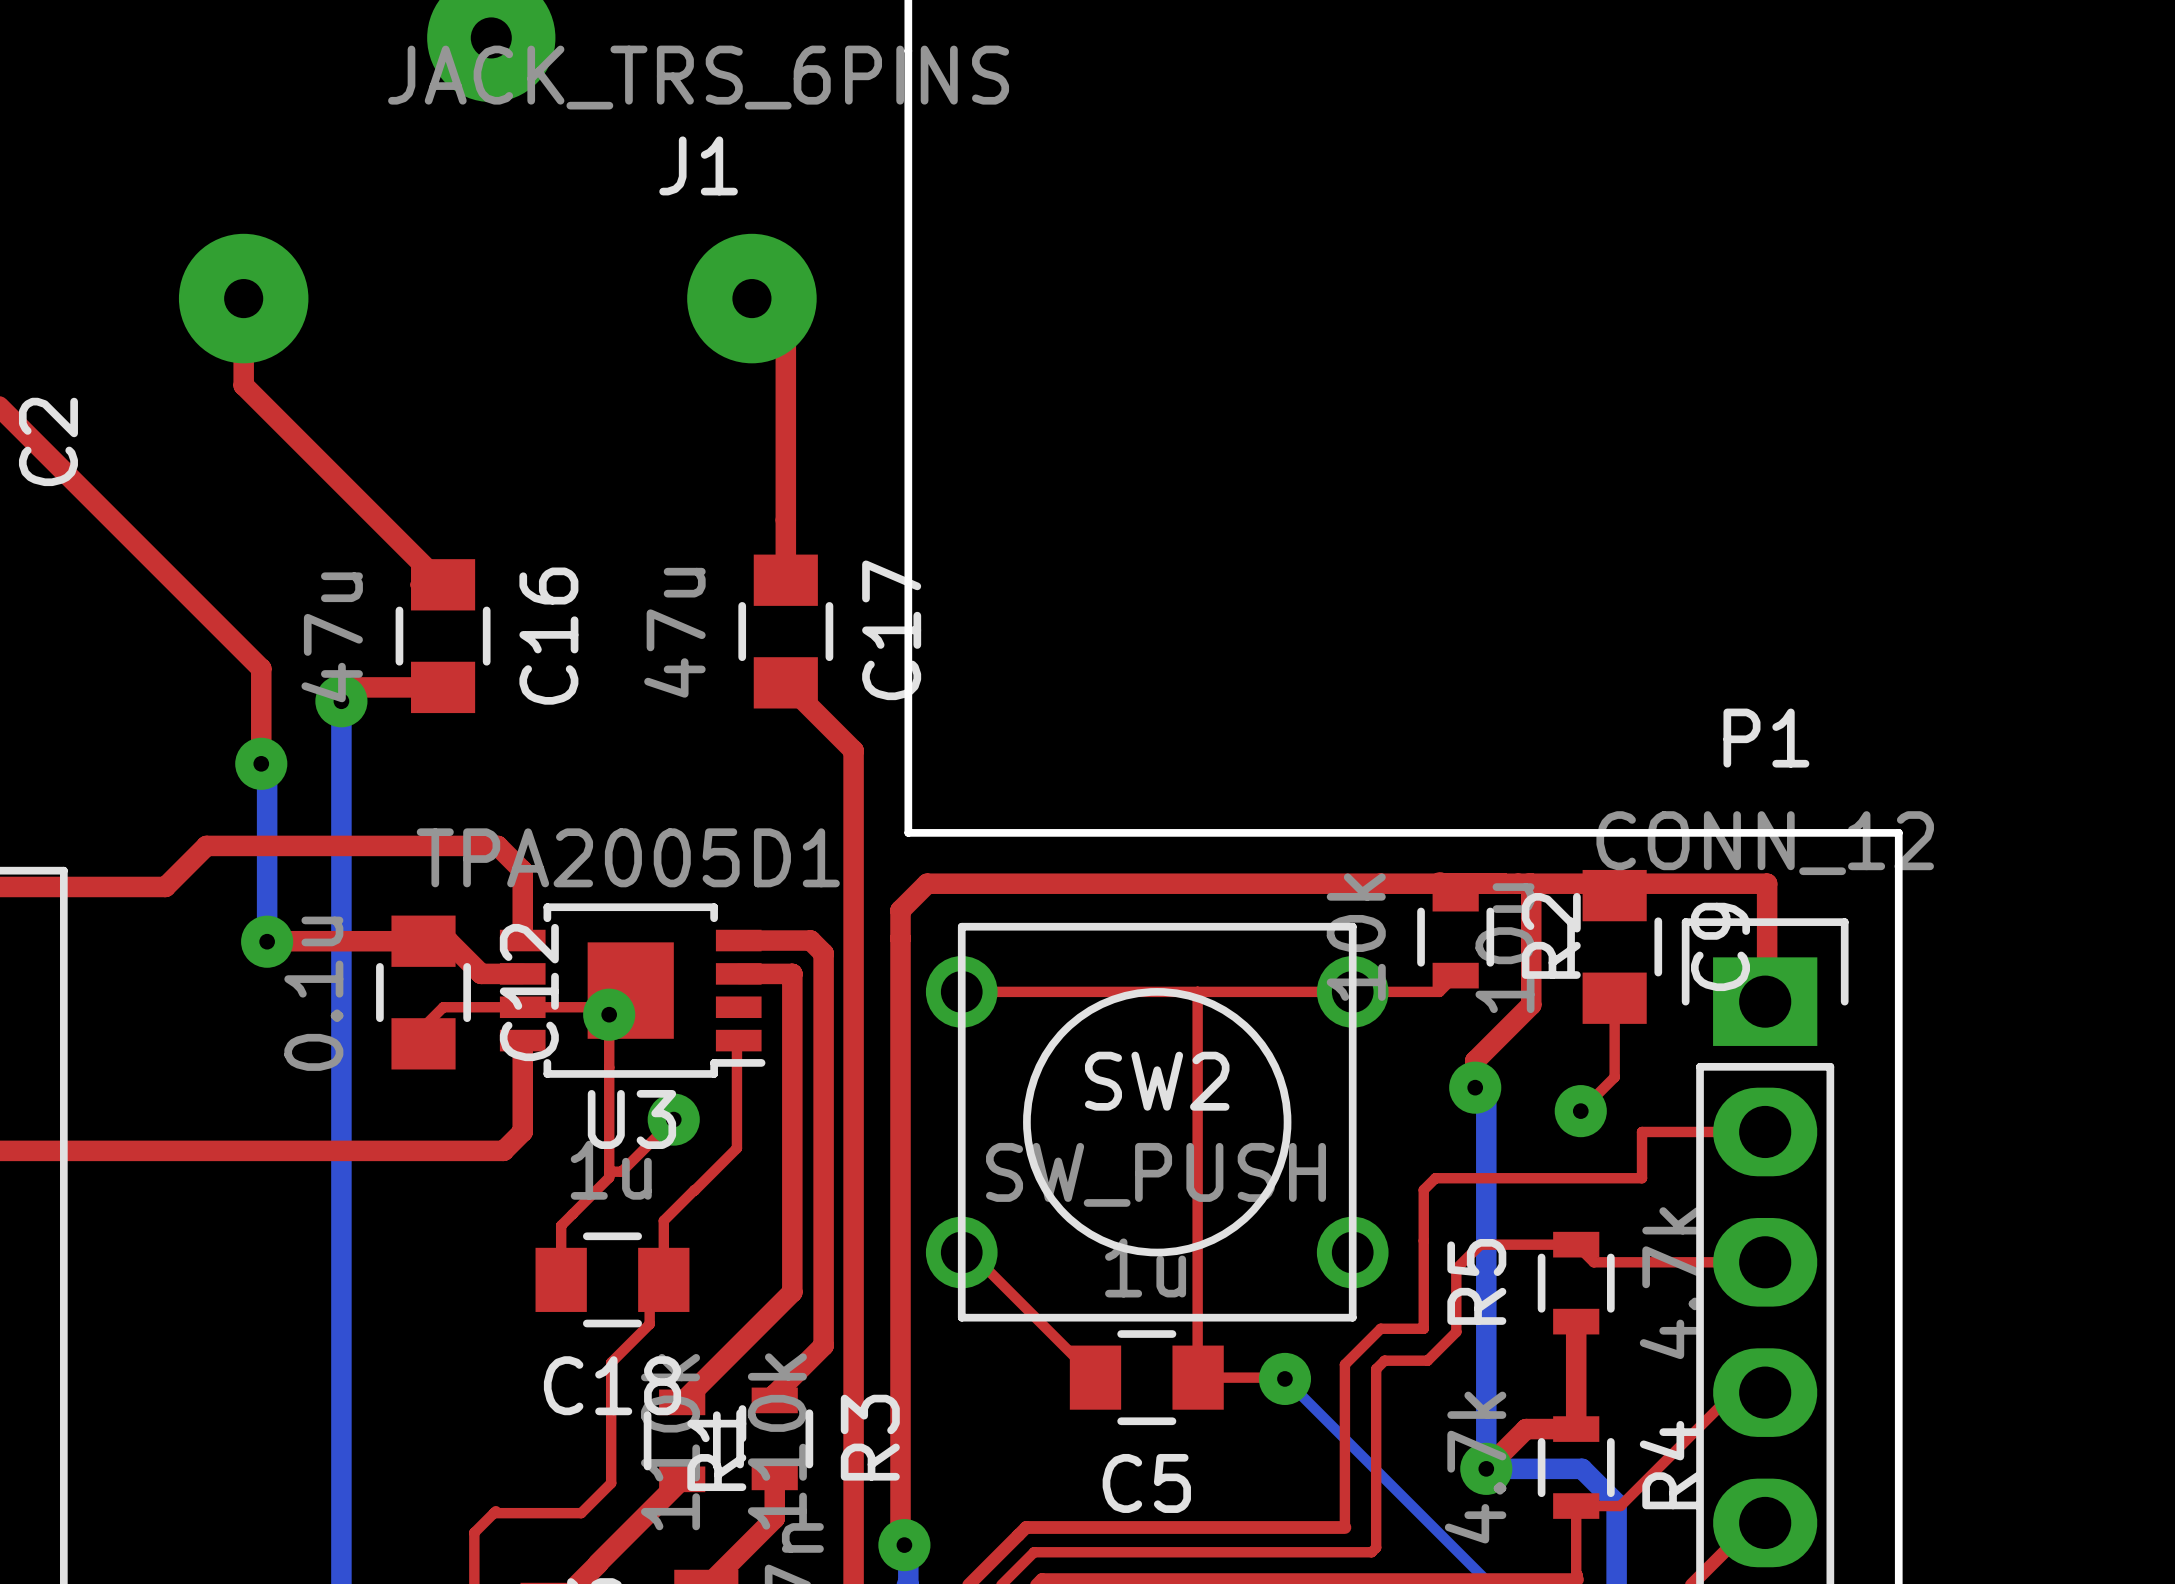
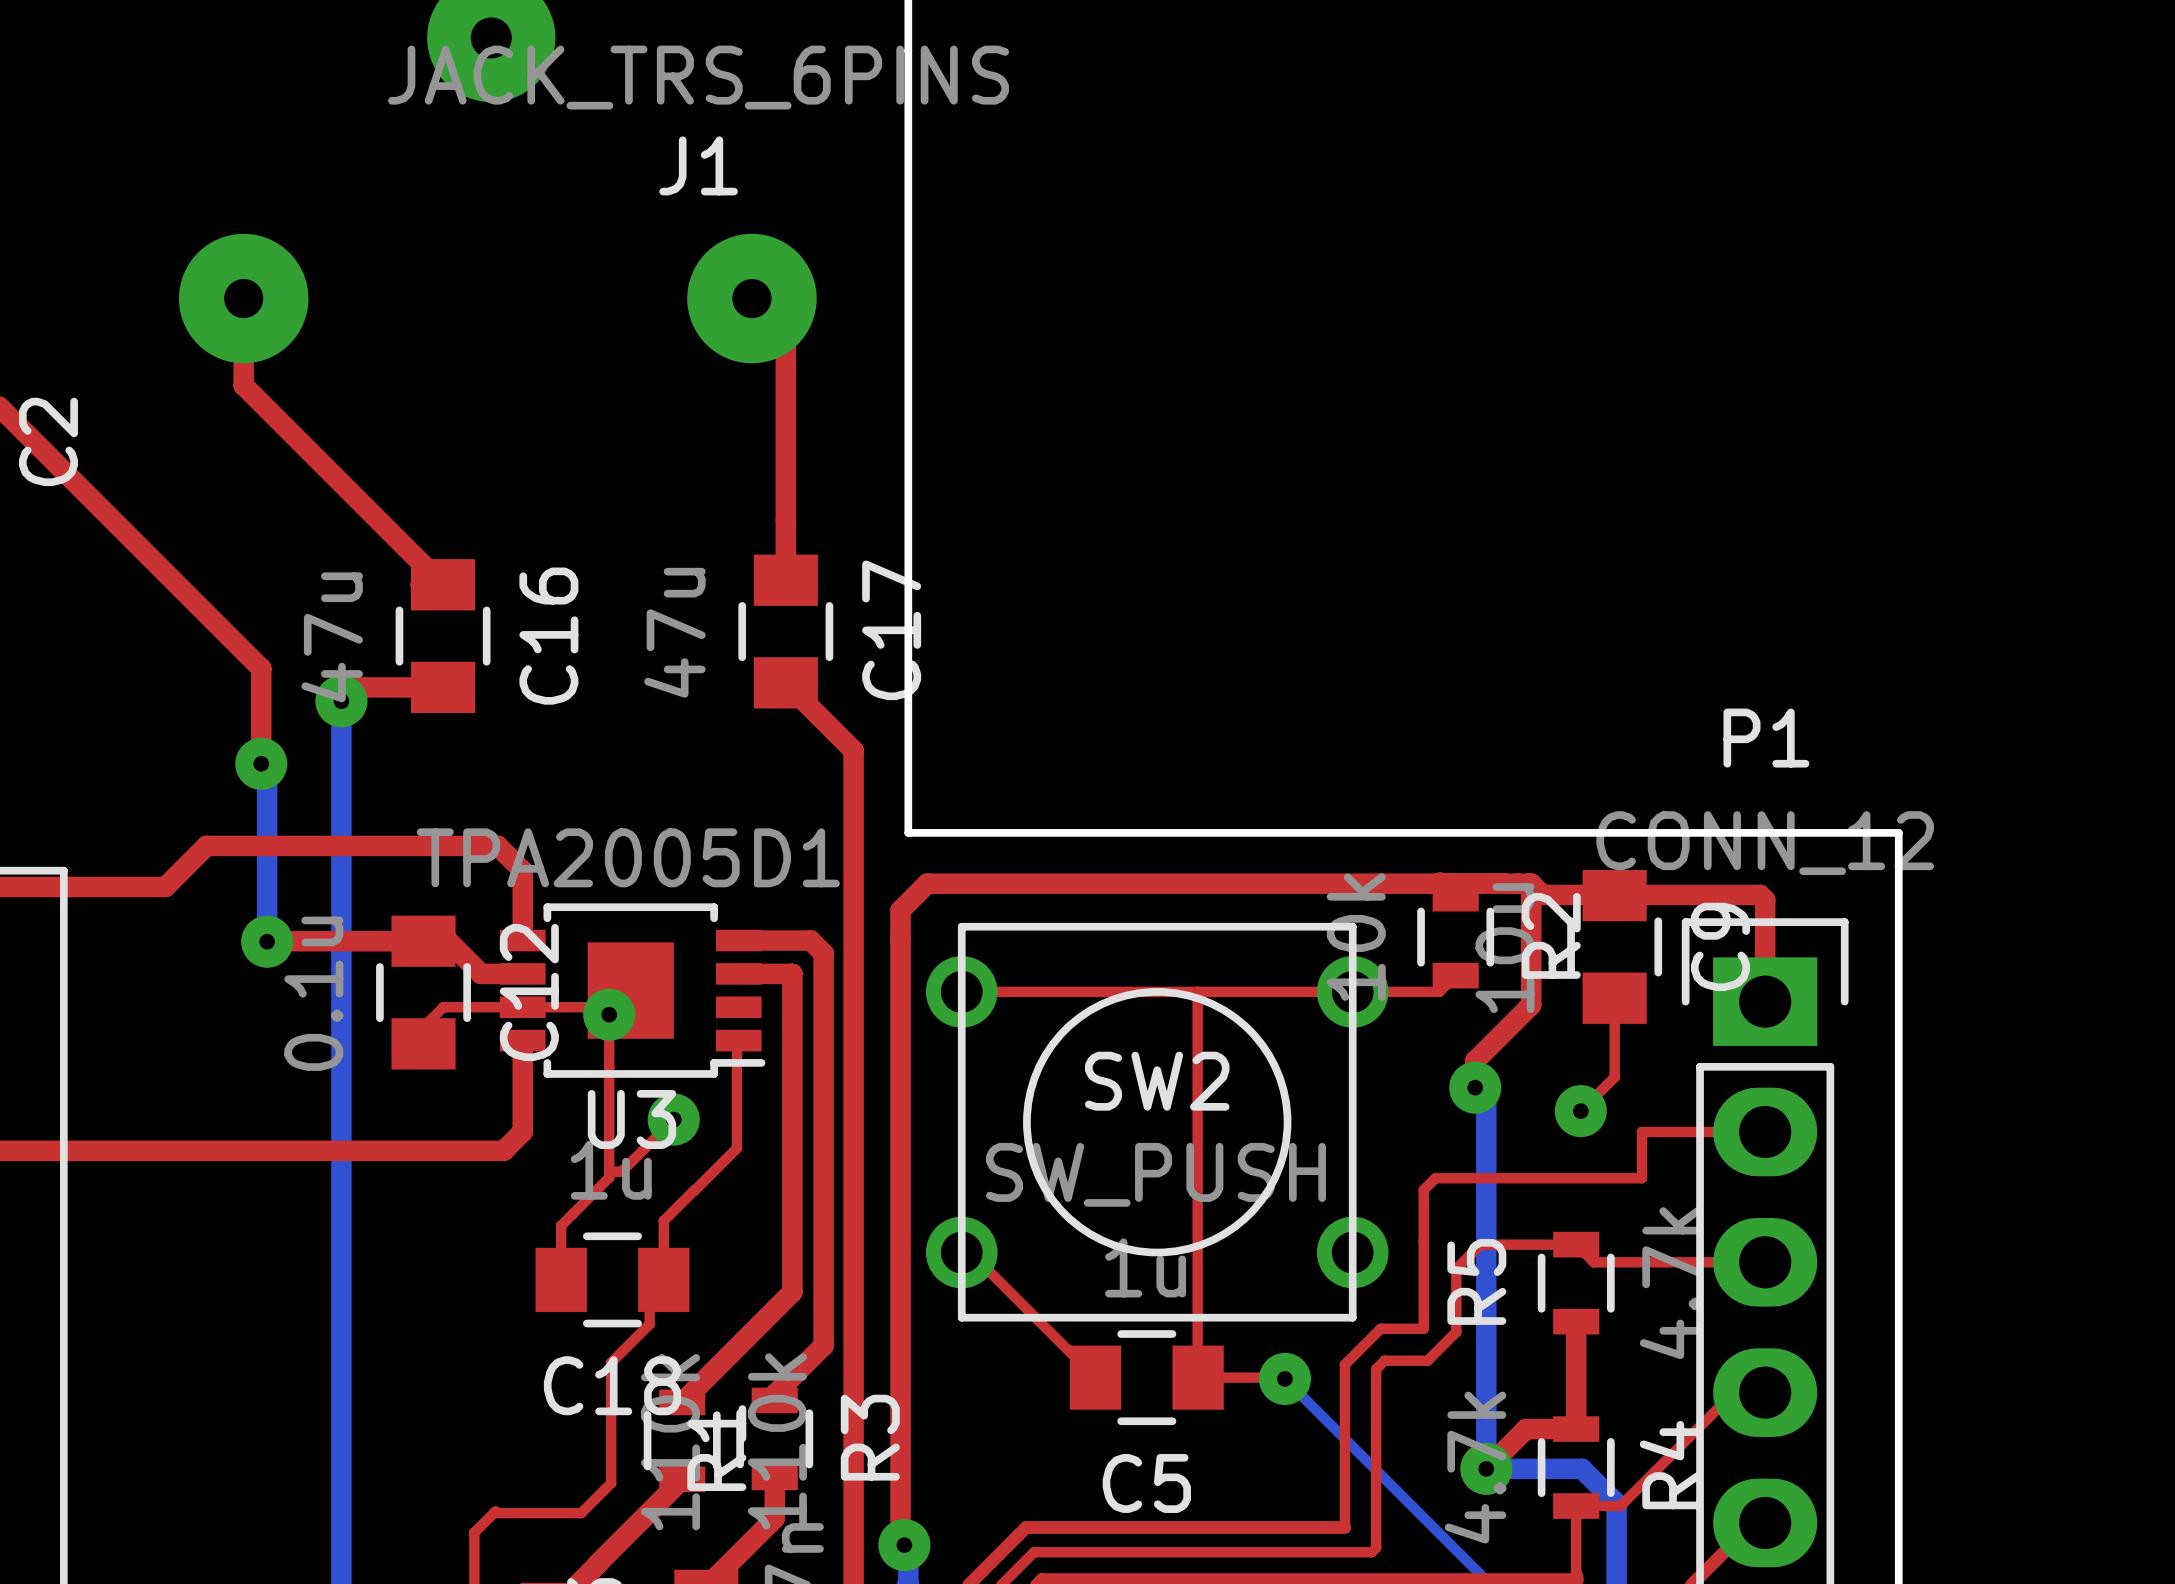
top track: (1531, 883) (1767, 883) (1767, 999) -> (1531, 883) (1542, 894) (1760, 894) (1765, 900) (1765, 1001) (1756, 1001)

